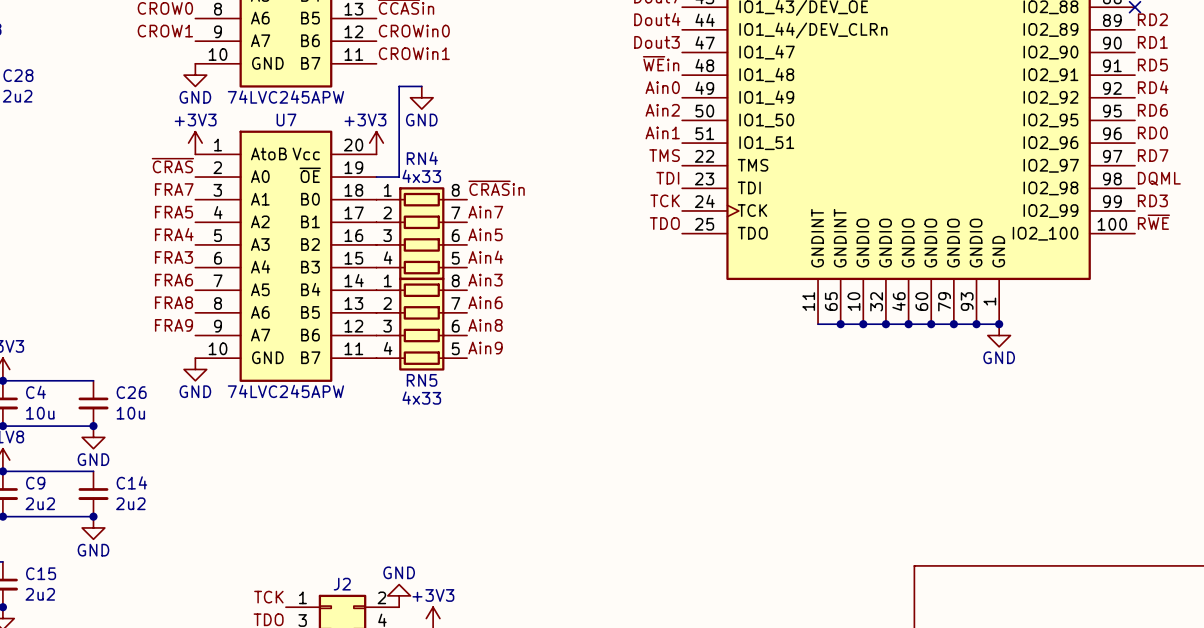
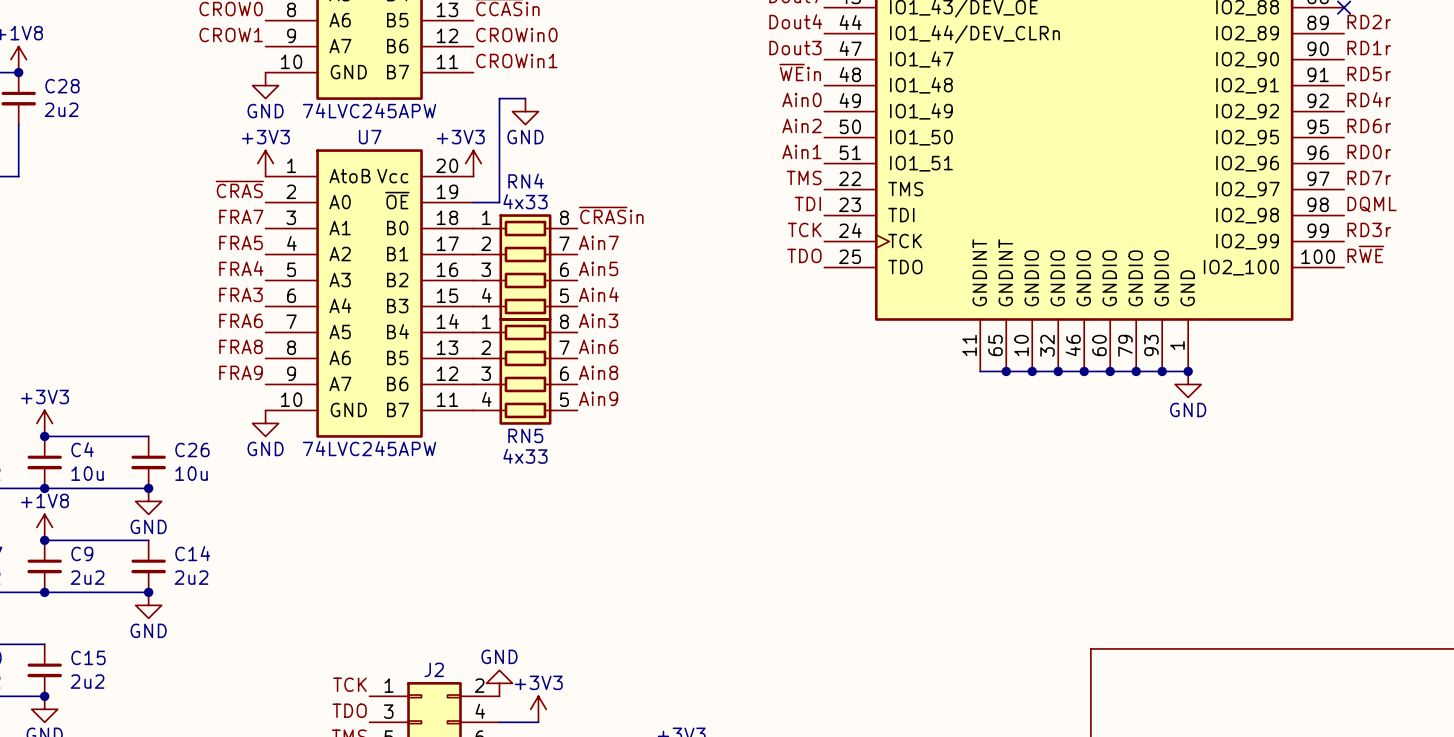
label: RD2 (1152, 19) -> RD2r (1369, 22)
label: RD1 (1152, 42) -> RD1r (1369, 48)
label: RD5 (1152, 65) -> RD5r (1369, 74)
label: RD4 (1153, 87) -> RD4r (1369, 99)
label: RD6 (1152, 110) -> RD6r (1369, 125)
label: RD0 (1152, 132) -> RD0r (1369, 151)
label: RD7 (1153, 155) -> RD7r (1369, 177)
label: RD3 (1152, 200) -> RD3r (1369, 229)

